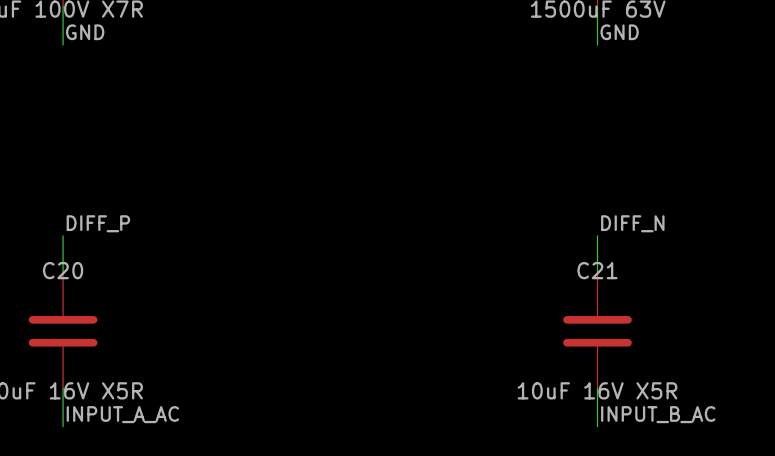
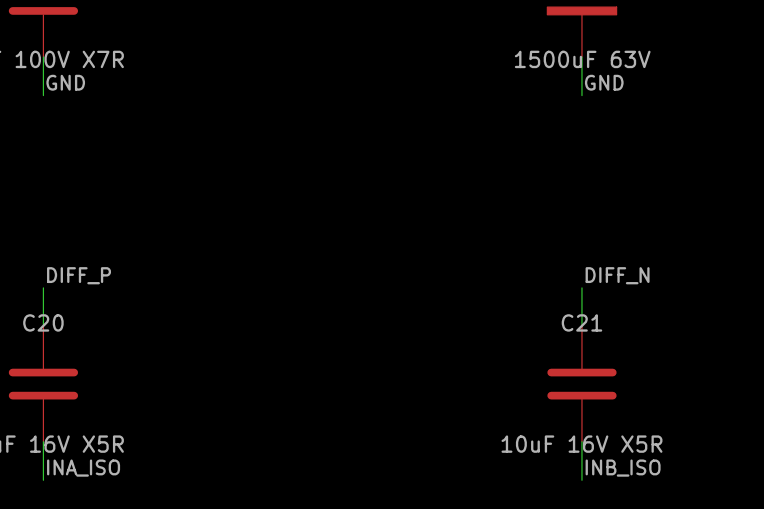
label: INPUT_A_AC (122, 414) -> INA_ISO (83, 468)
label: INPUT_B_AC (658, 414) -> INB_ISO (623, 468)

